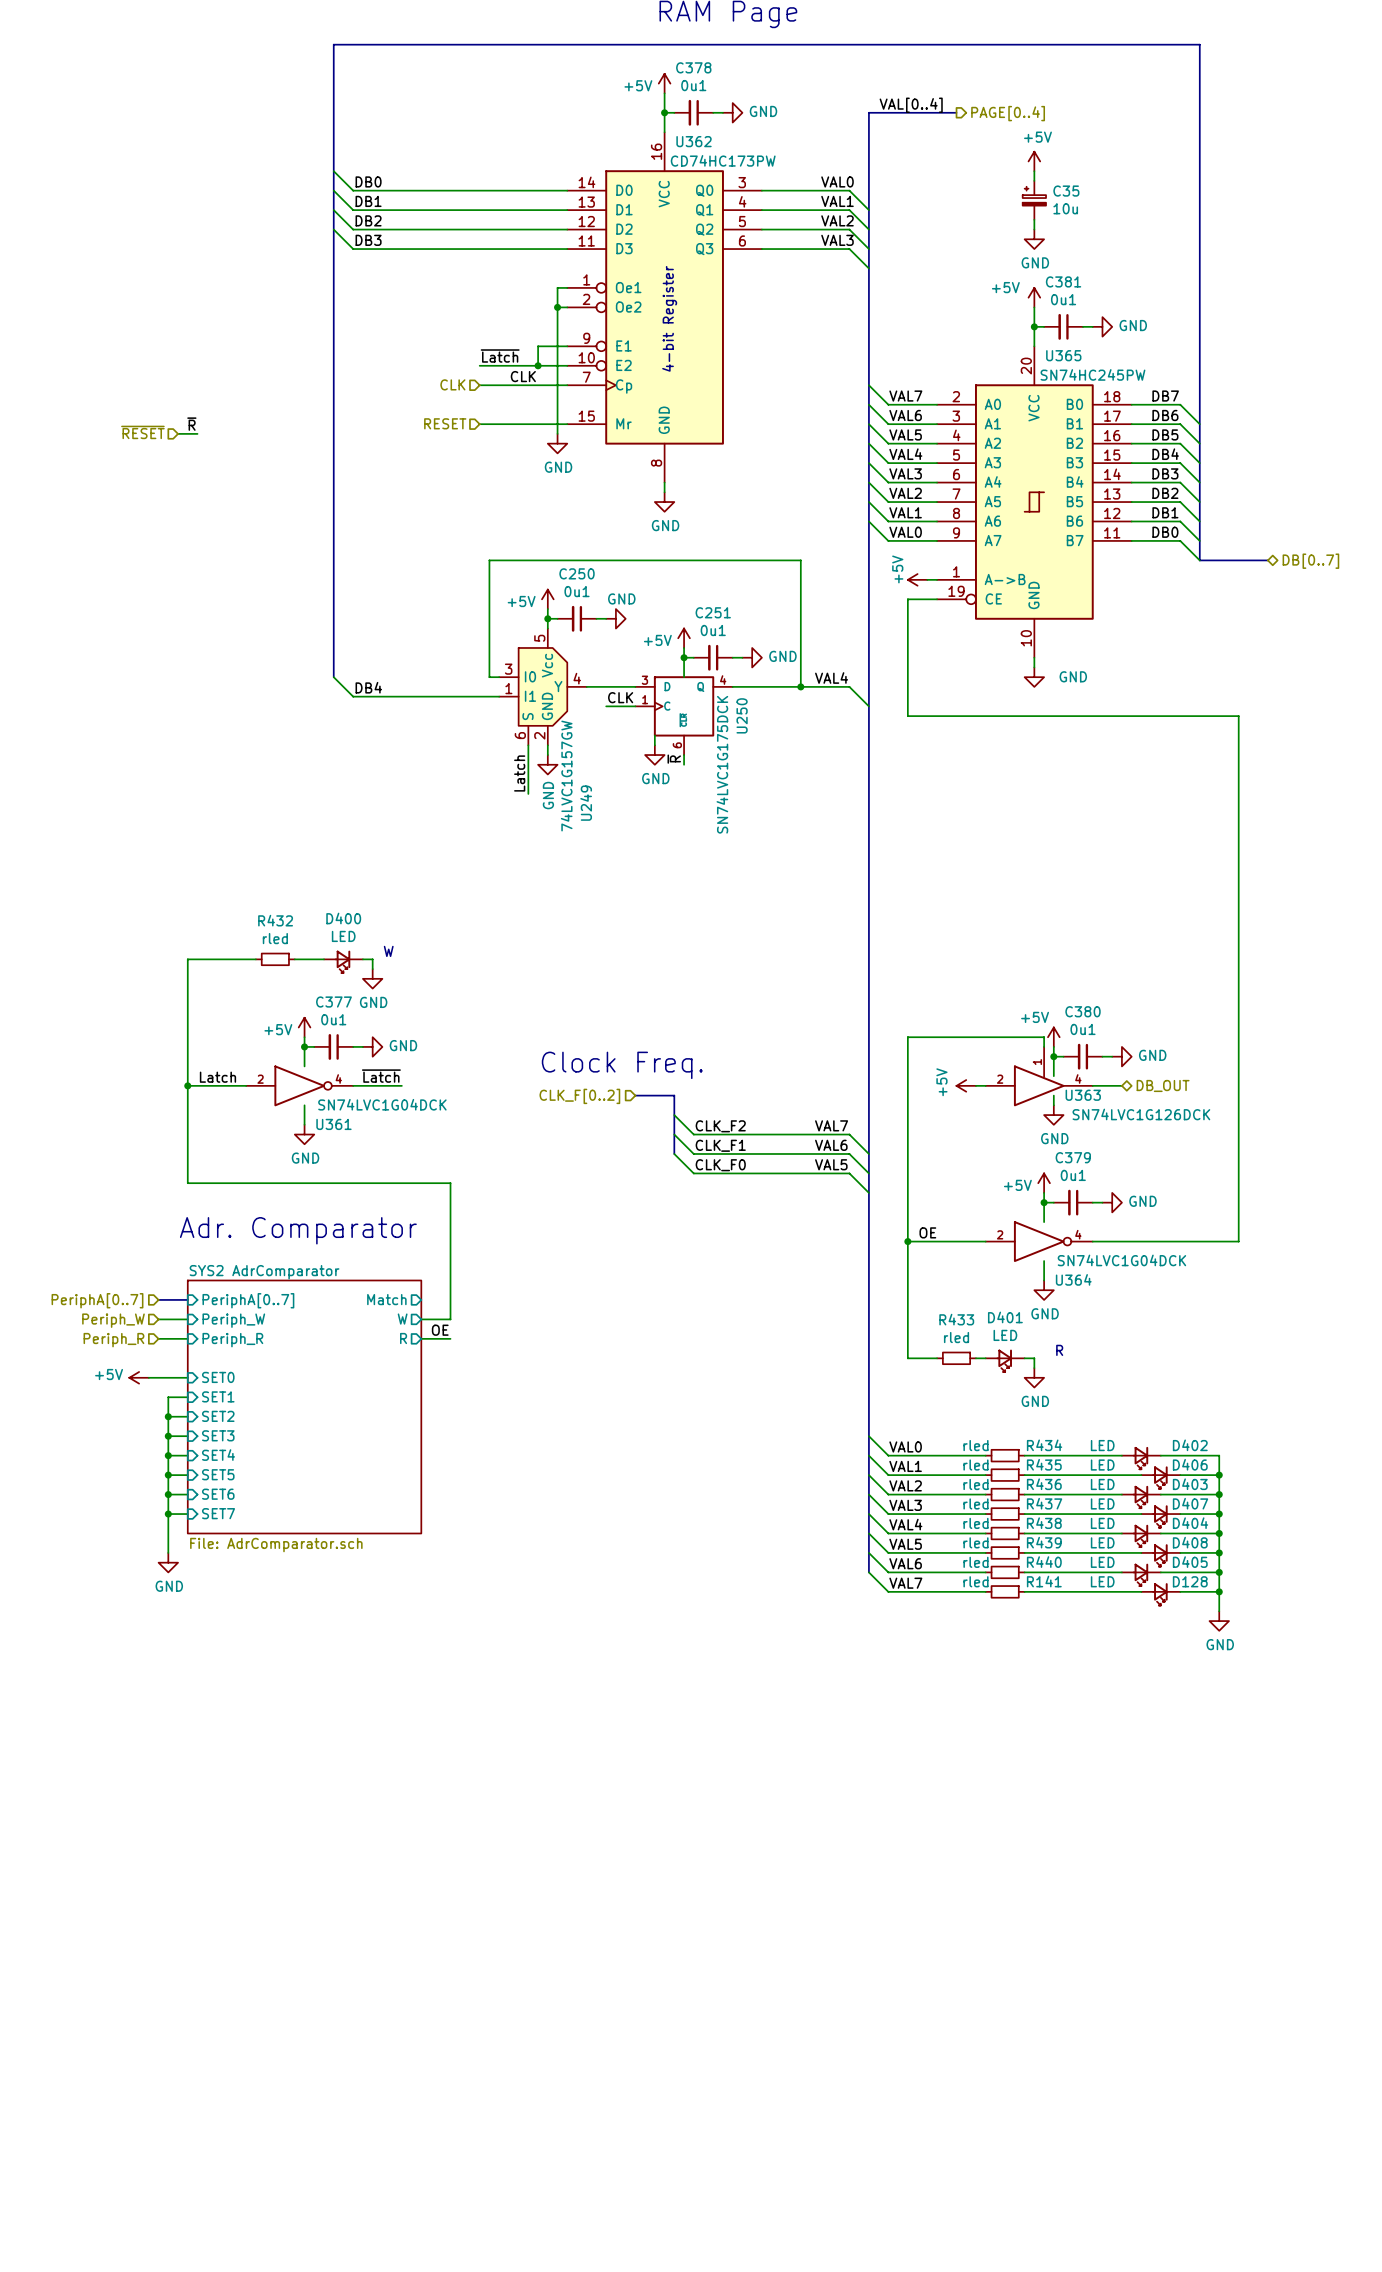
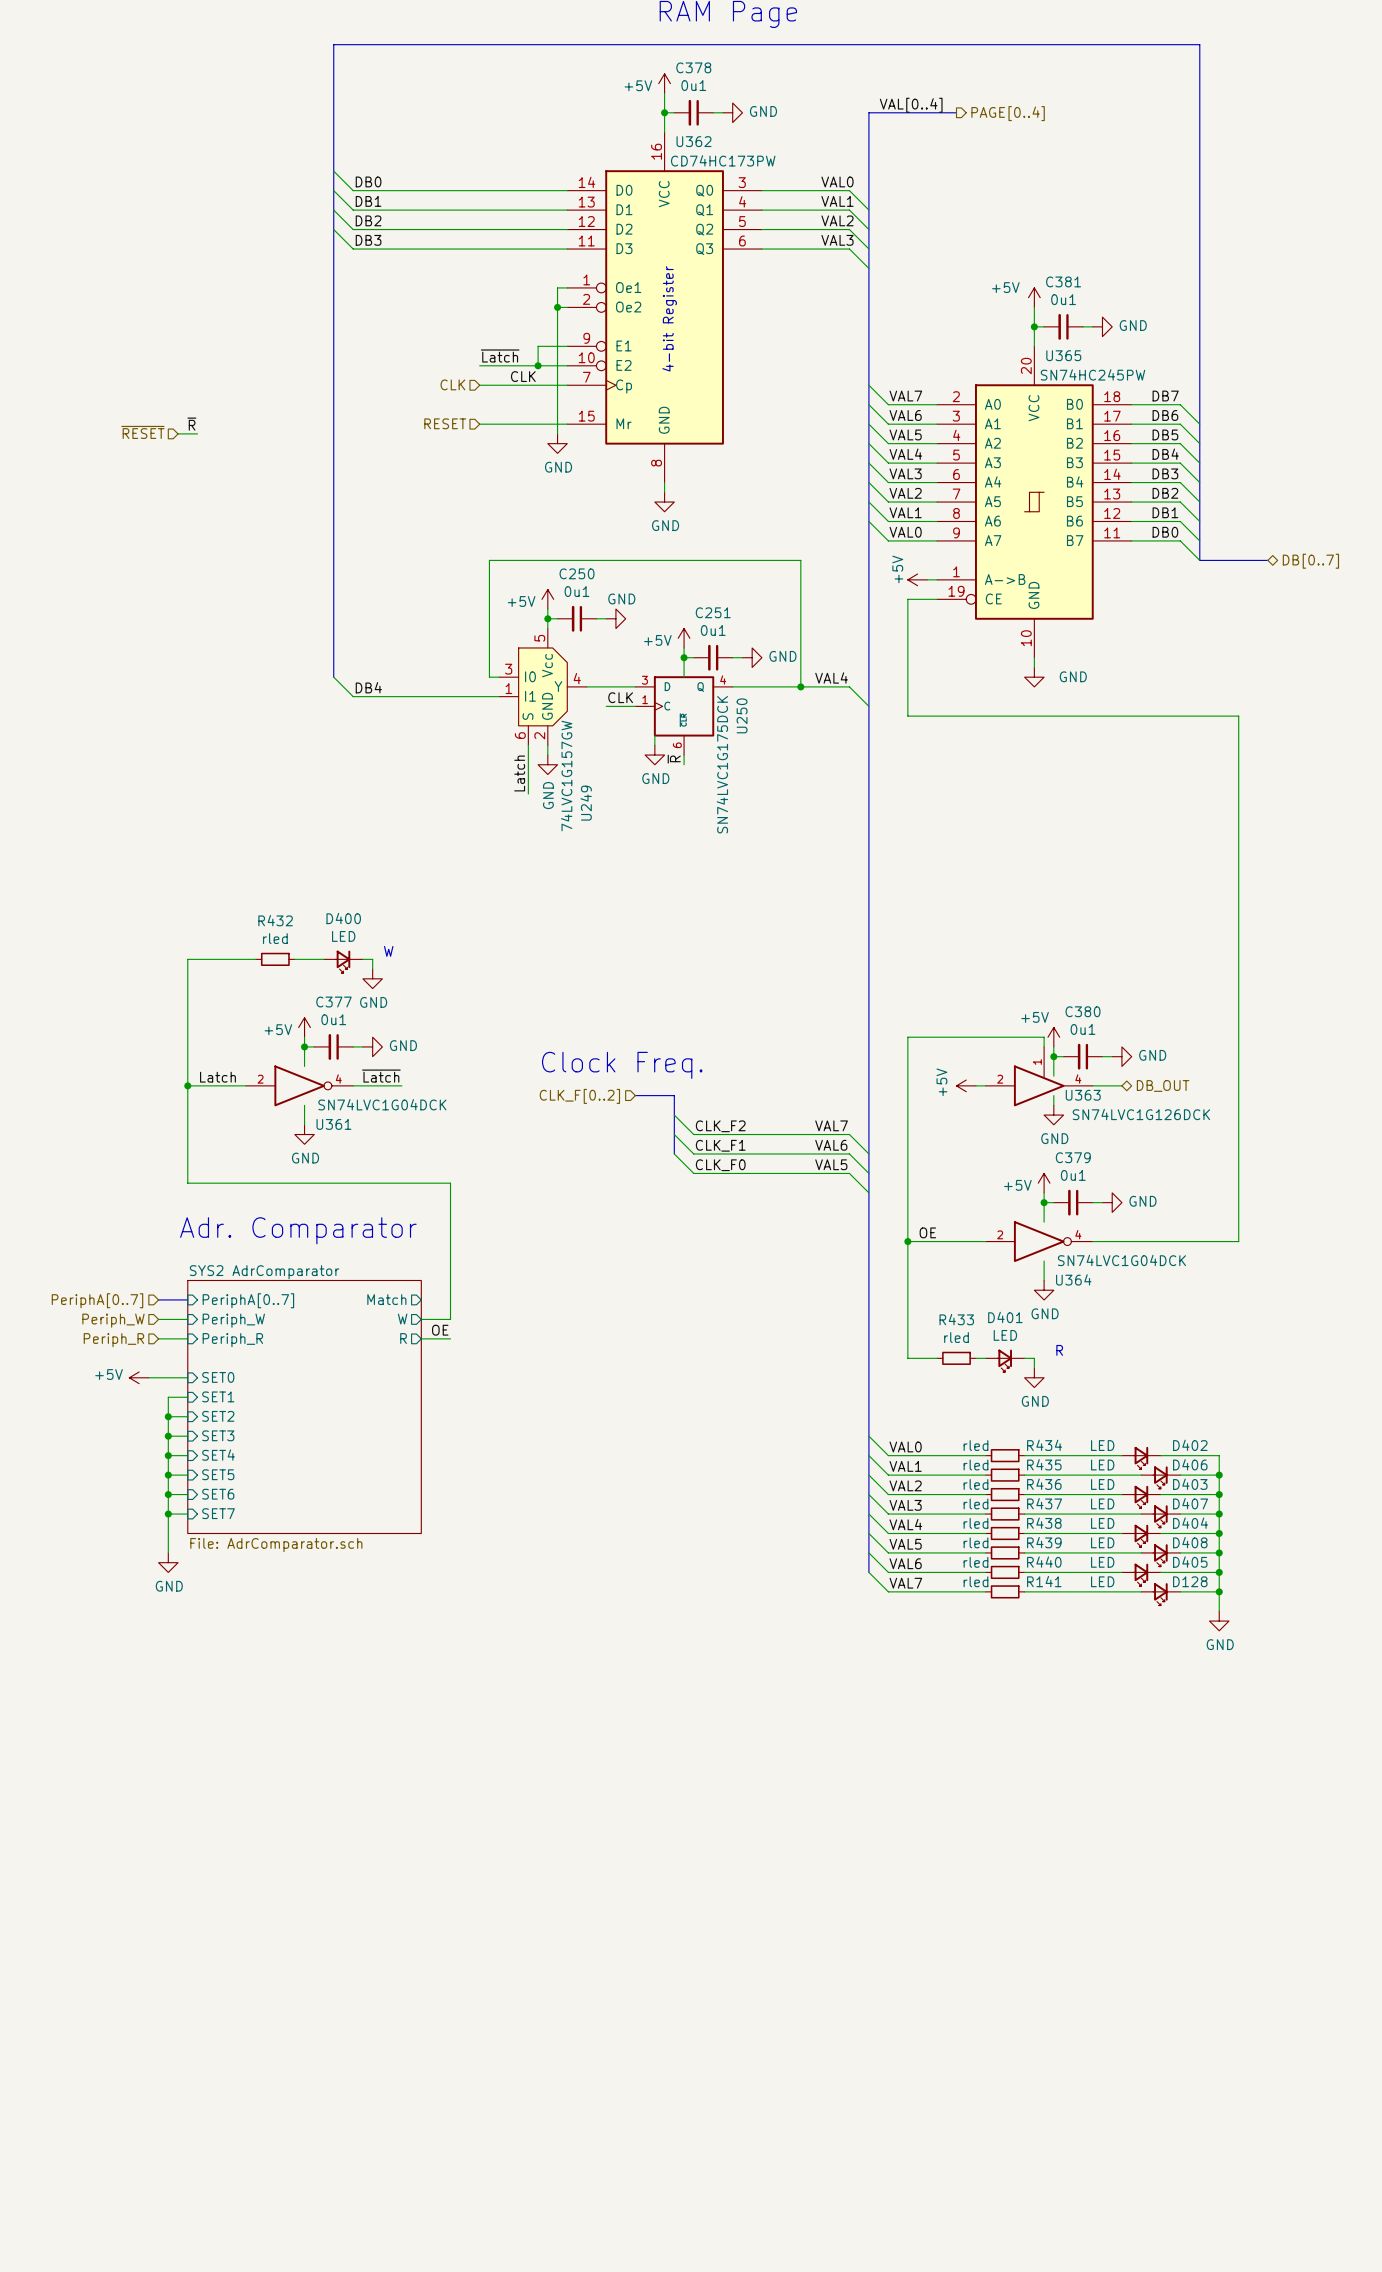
power symbol: +5V (1034, 161) -> none
wire: (1034, 171) (1034, 180) -> none
C35: 10u (1034, 200) -> none
wire: (1034, 219) (1034, 229) -> none
power symbol: GND (1034, 239) -> none

